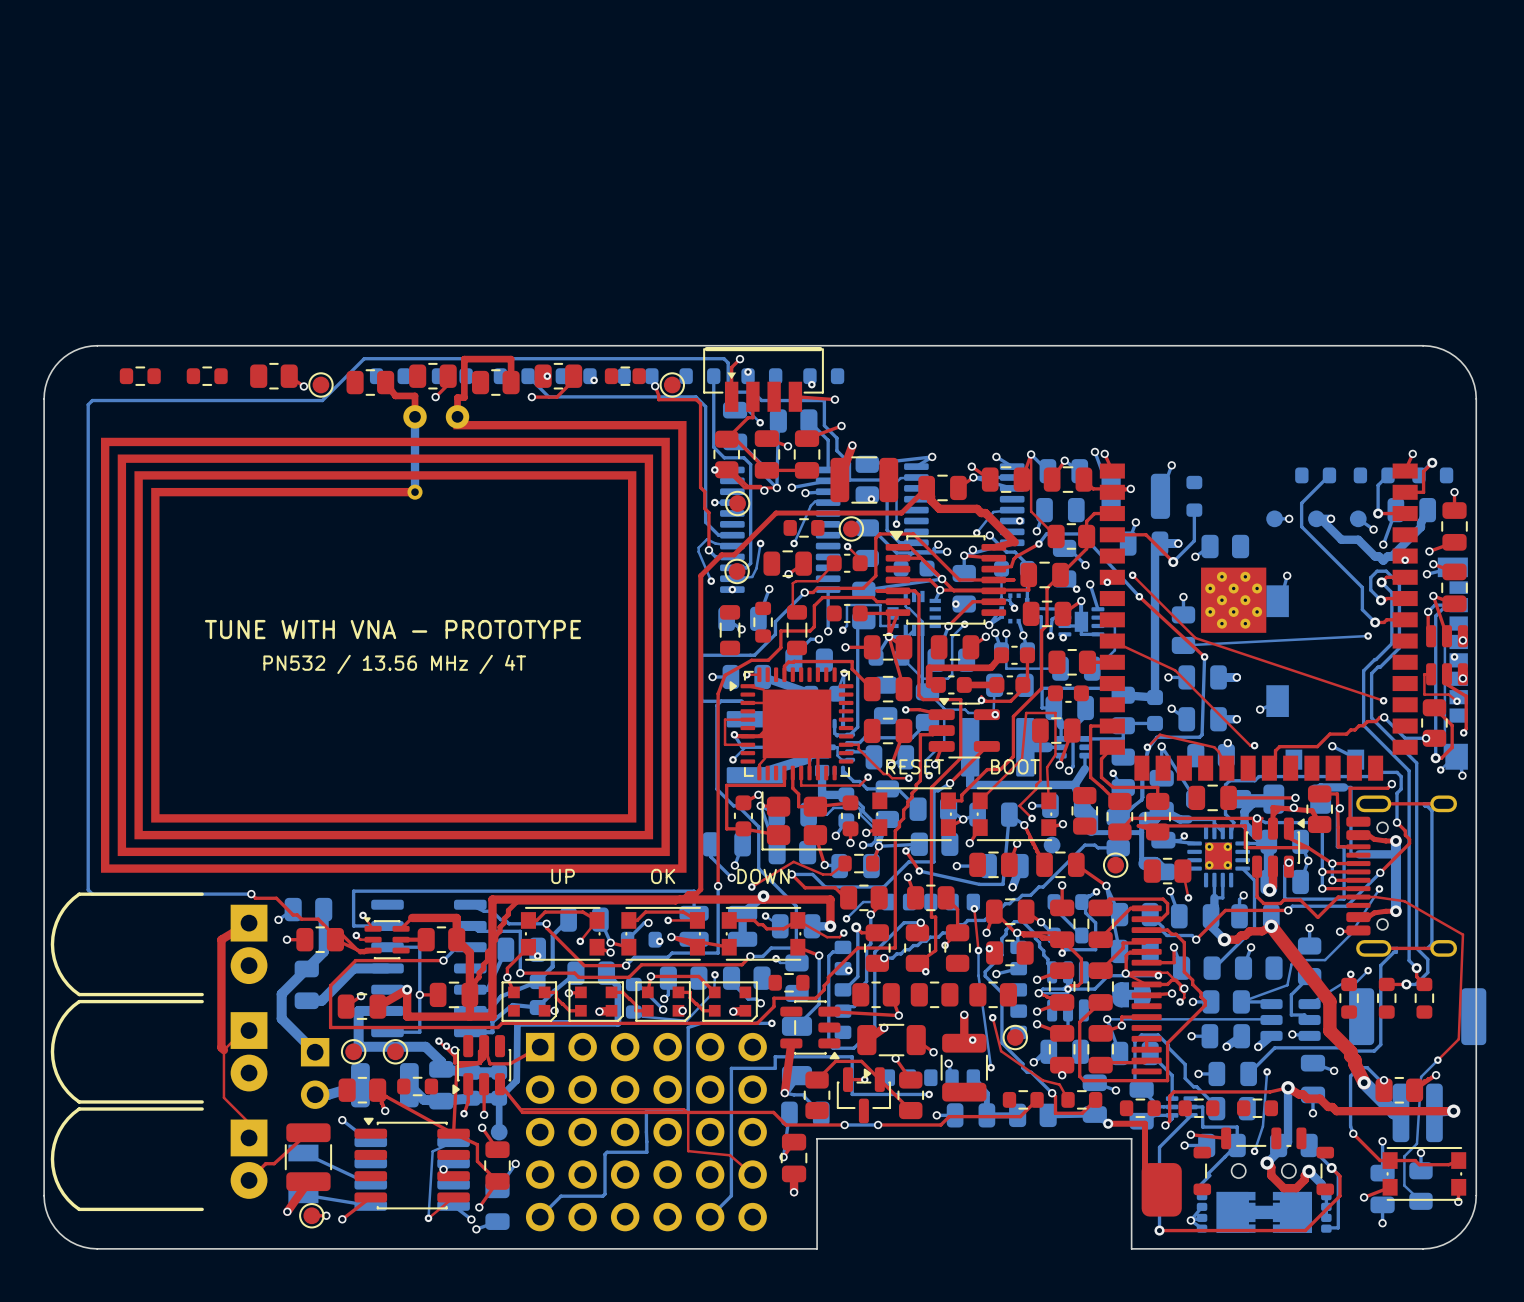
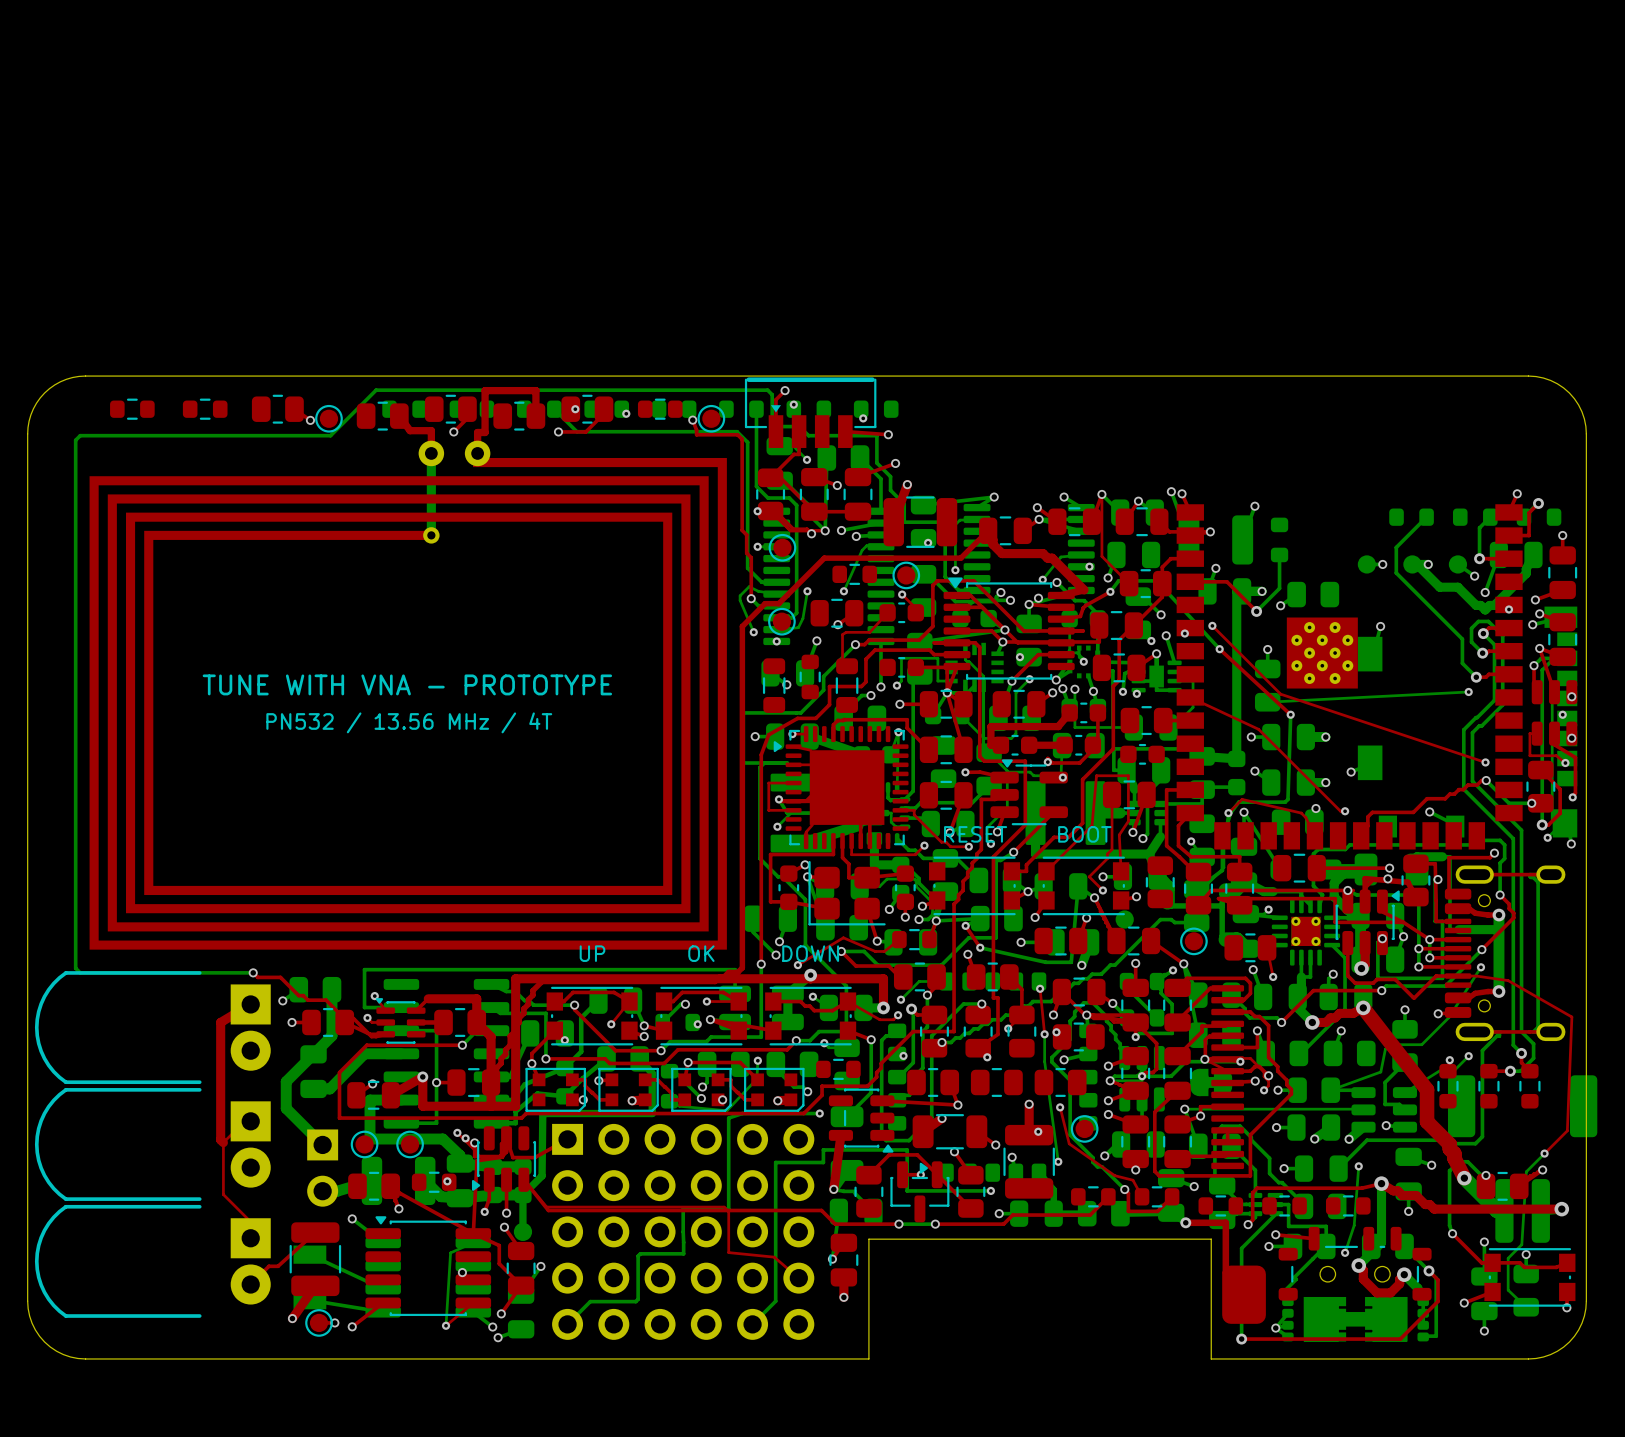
via: none -> (447, 1181)

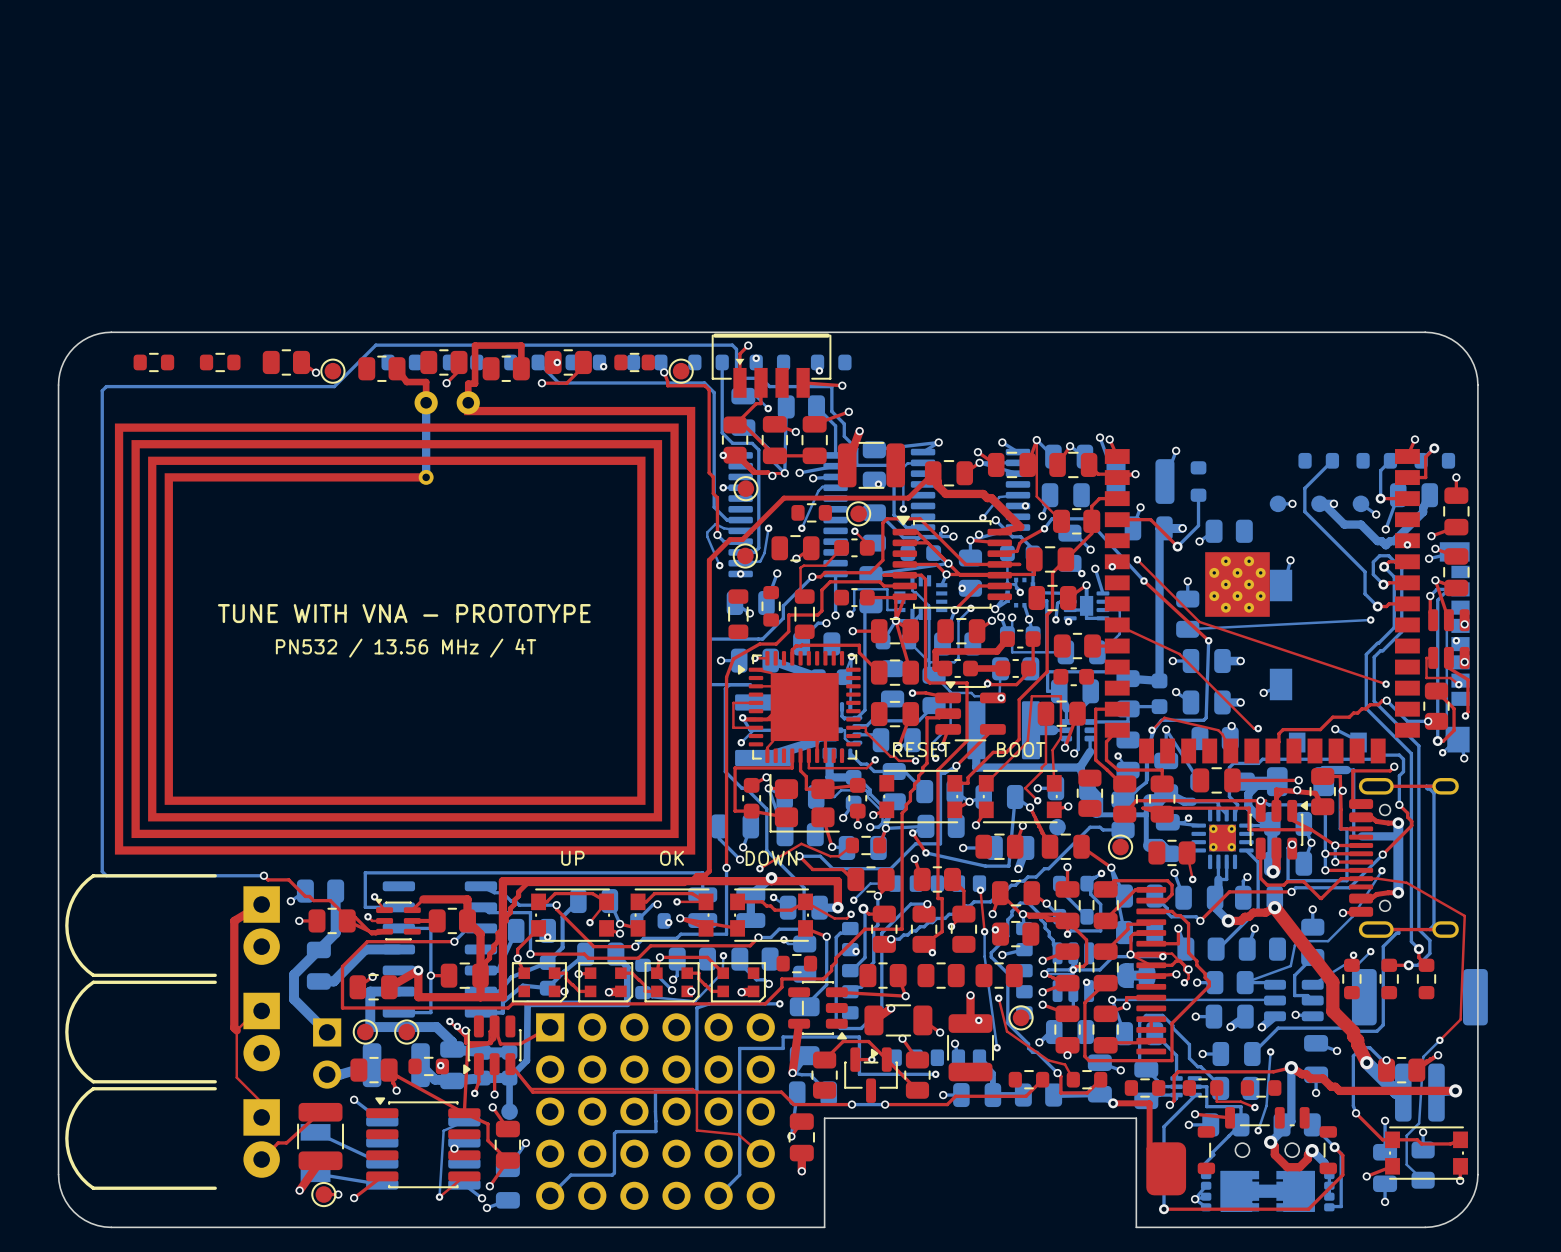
via: none -> (1086, 982)
top track: none -> (1216, 1088) (1216, 1101) (1240, 1101) (1254, 1107)
via: none -> (1254, 1107)

